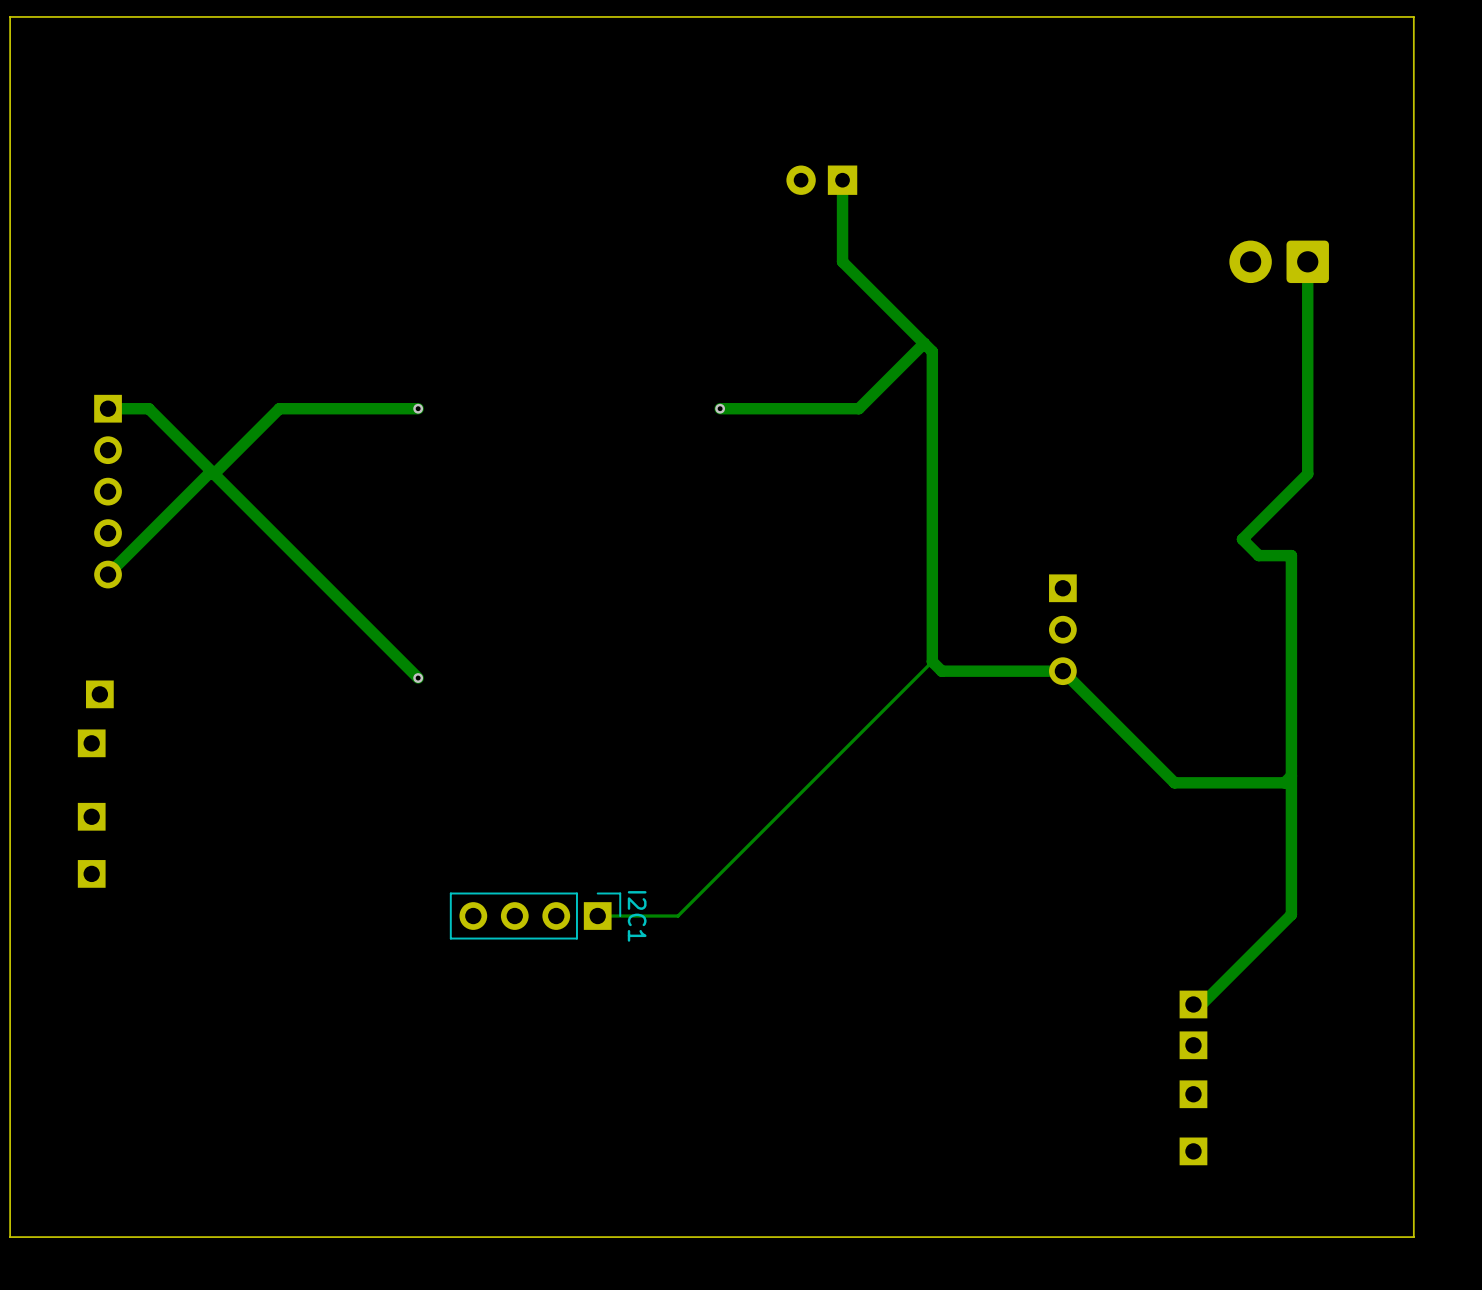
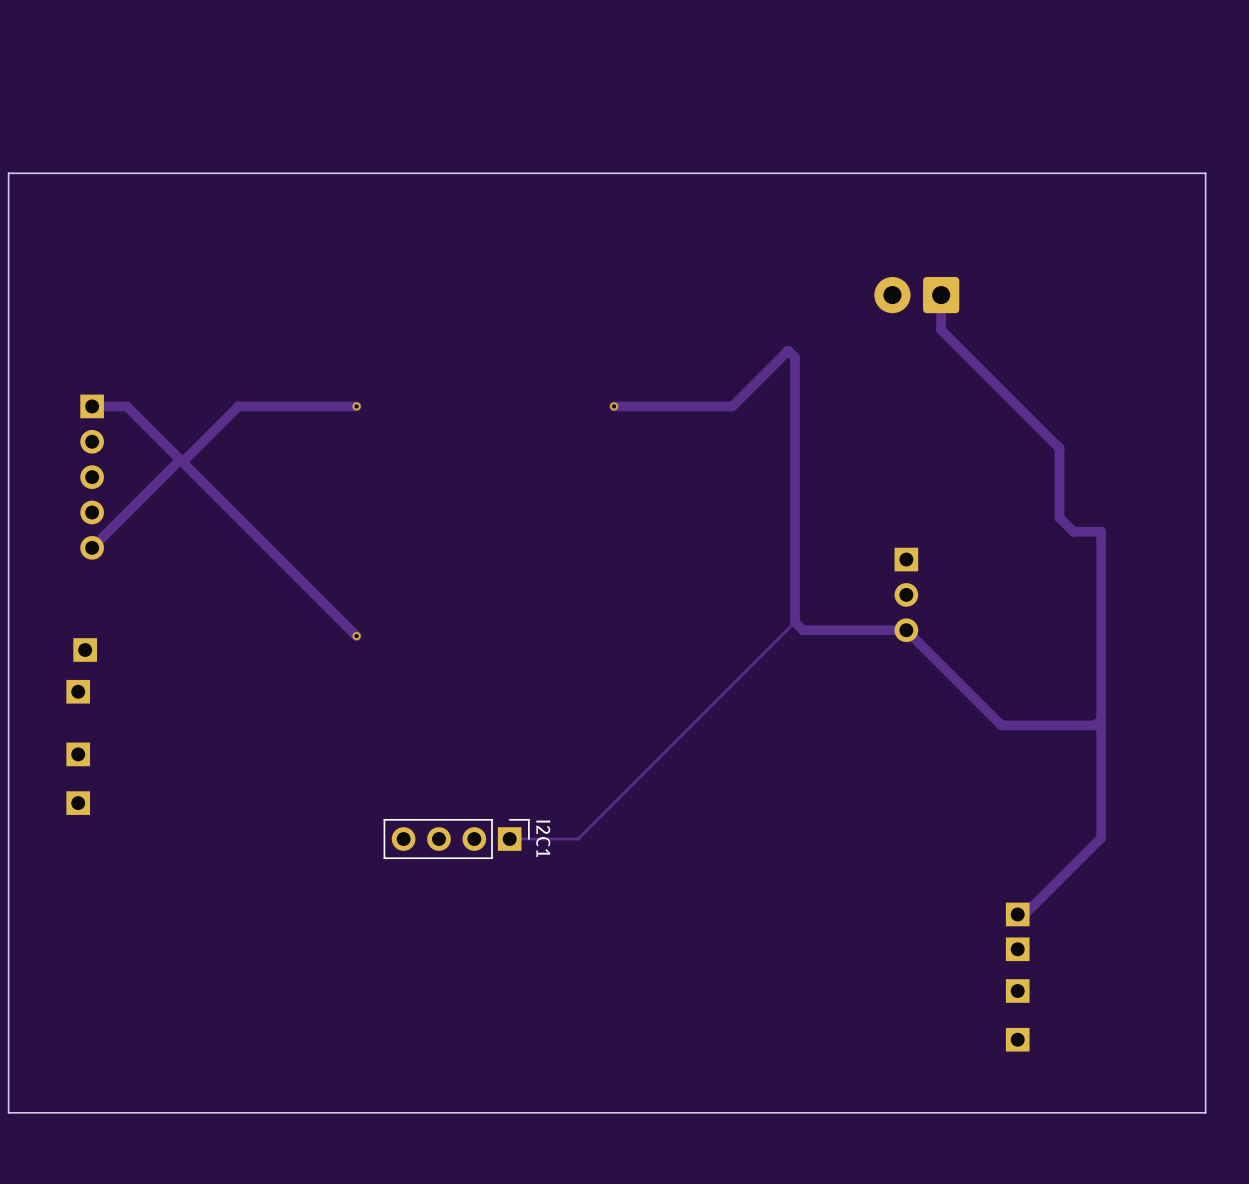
board edge: (1413, 135) (1413, 16) (10, 16) (10, 135) -> (1205, 173) (8, 173)
part: (821, 180) -> none
track: (842, 180) (842, 261) (924, 343) -> none
part position: (1279, 261) -> (916, 295)
track: (1307, 261) (1307, 474) (1242, 539) -> (941, 295) (941, 329) (1059, 448) (1059, 517)

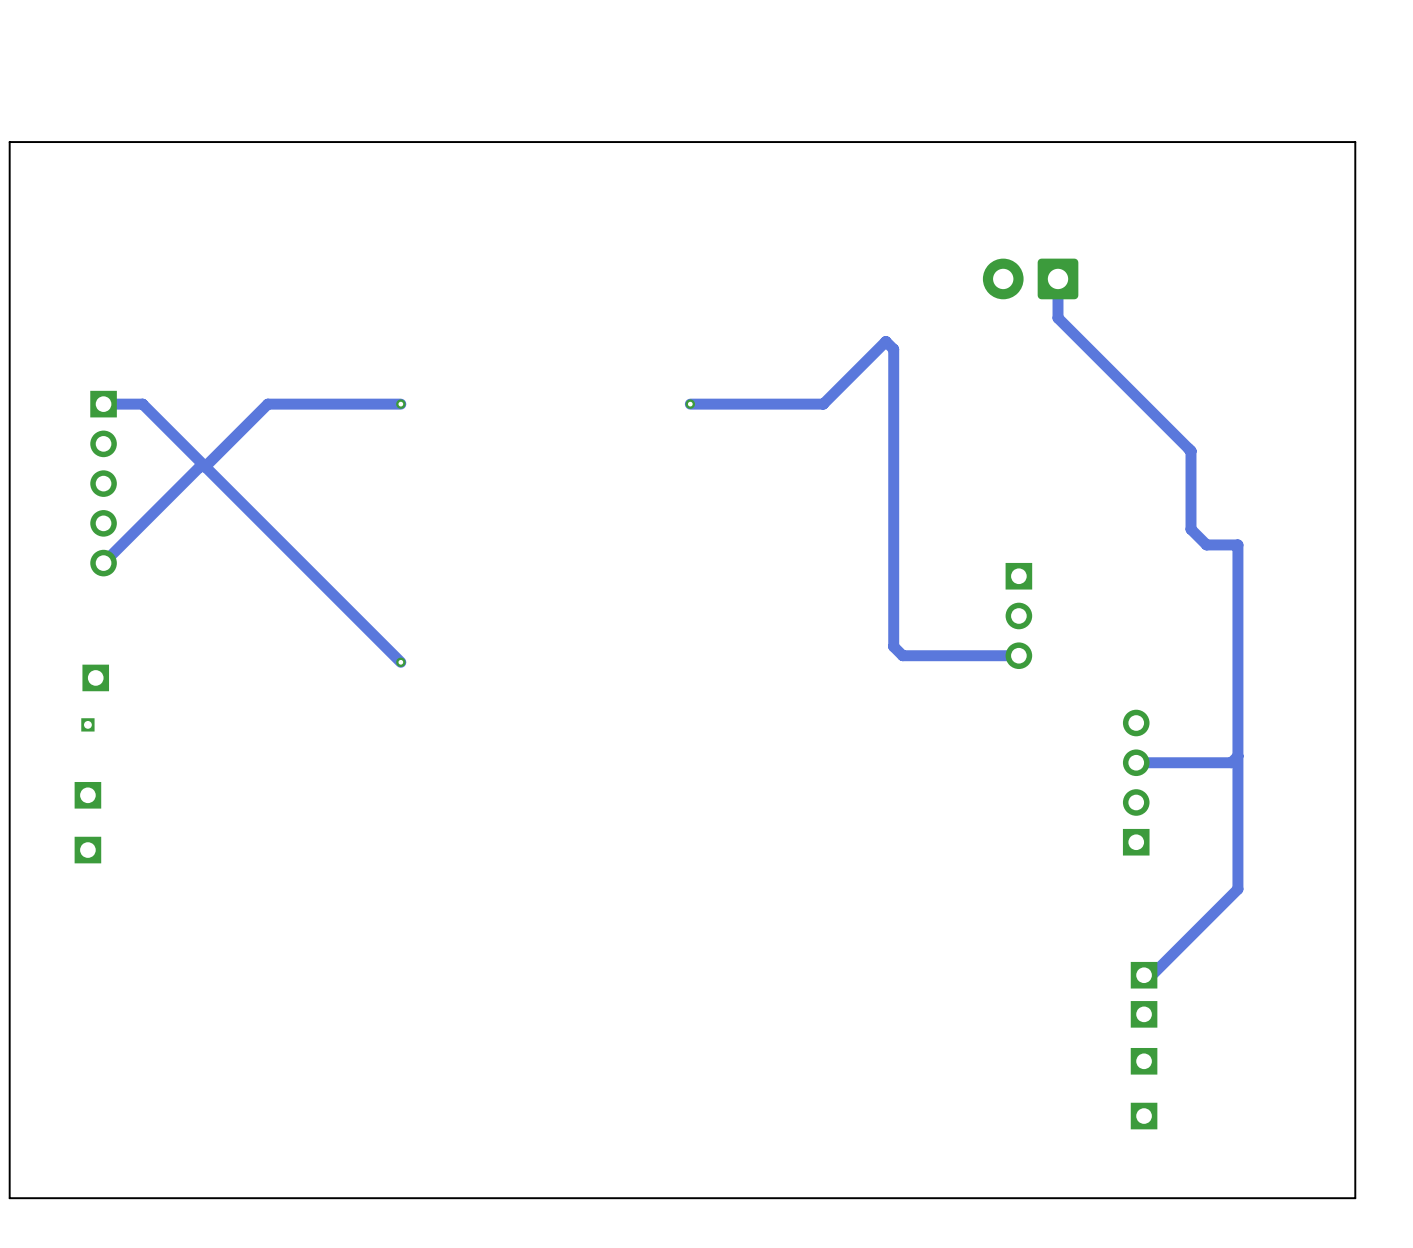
track: (795, 622) (578, 839) (509, 839) -> none
track: (906, 630) (1001, 725) (1010, 725) -> none
part footprint: [66, 679, 91, 704] -> [81, 718, 95, 732]
part: none -> (1136, 782)
I2C1: (456, 839) -> none

